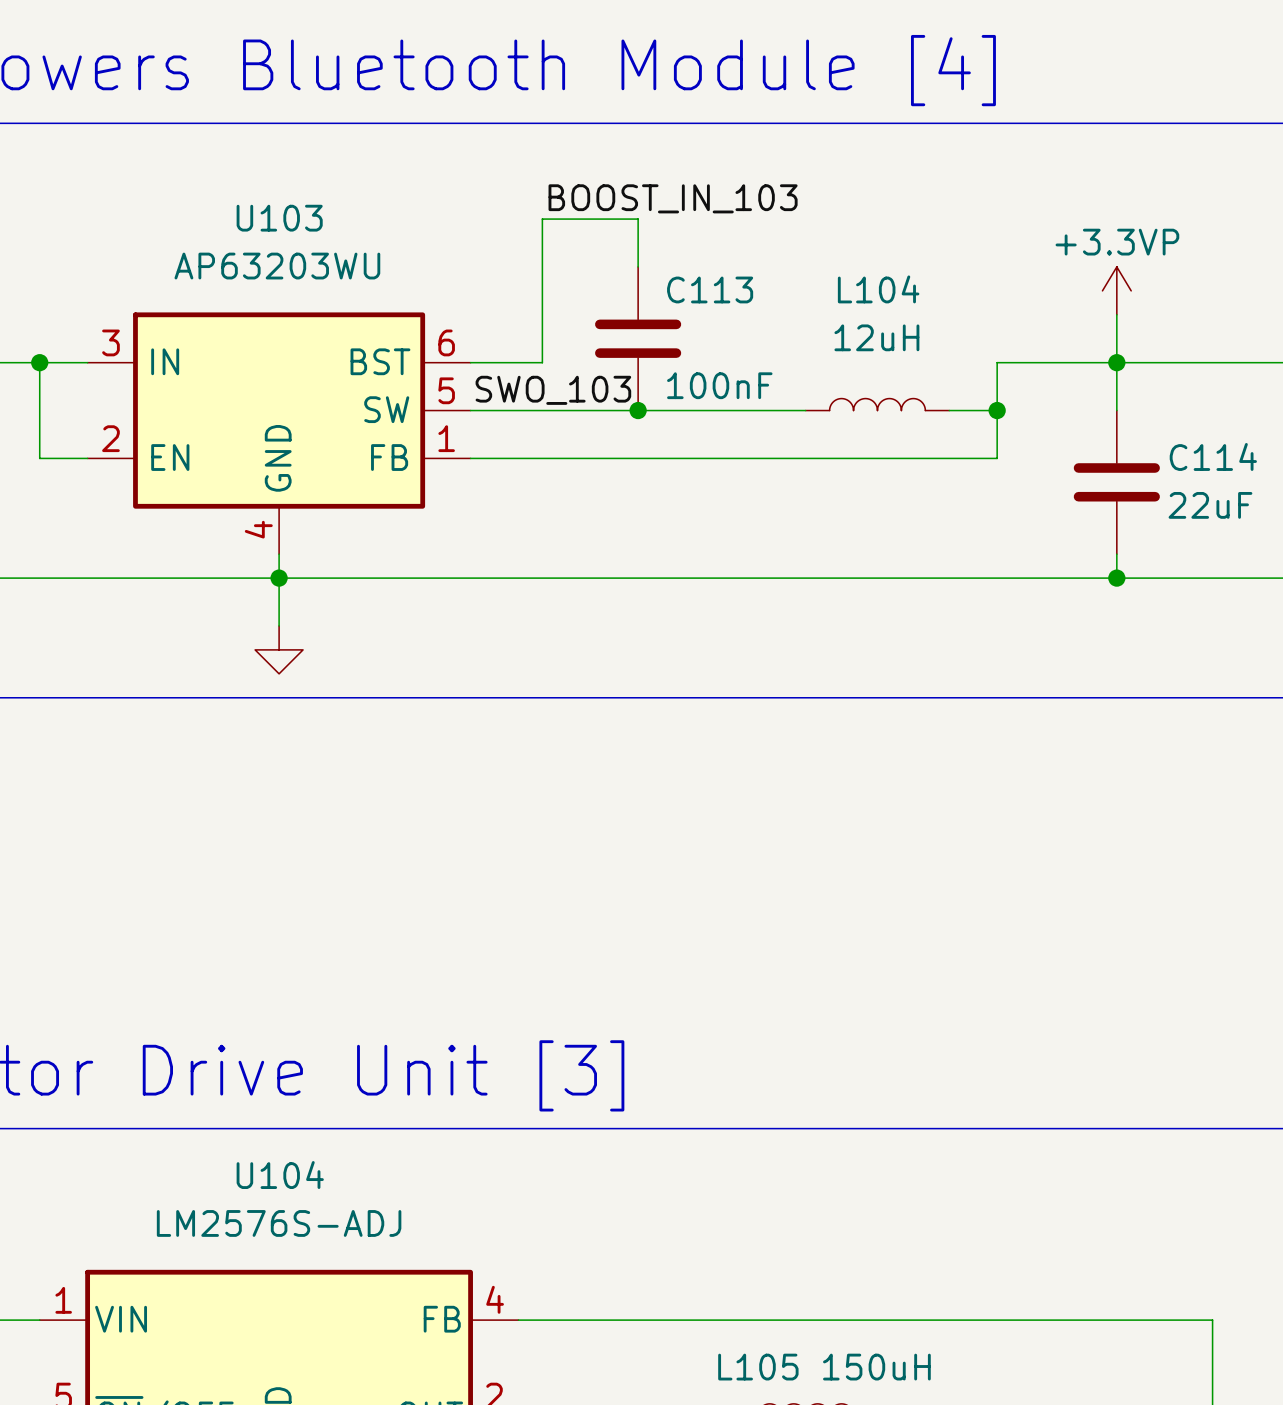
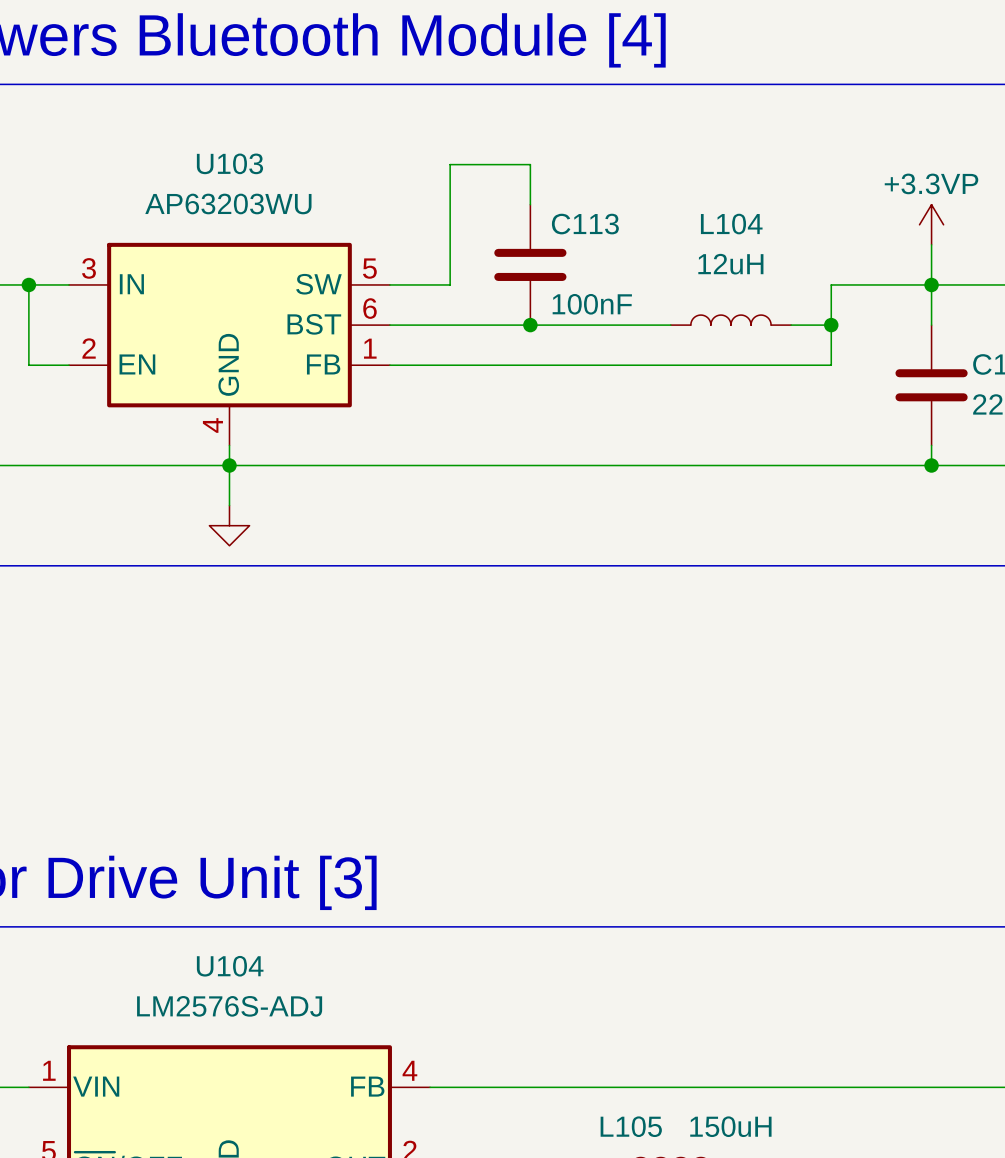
label: BOOST_IN_103 (673, 198) -> none
U103 pin number: 6 (446, 342) -> 5 (369, 268)
U103 pin name: BST (380, 361) -> SW (318, 284)
U103 pin number: 5 (446, 390) -> 6 (370, 308)
label: SWO_103 (553, 390) -> none
U103 pin name: SW (386, 409) -> BST (314, 324)

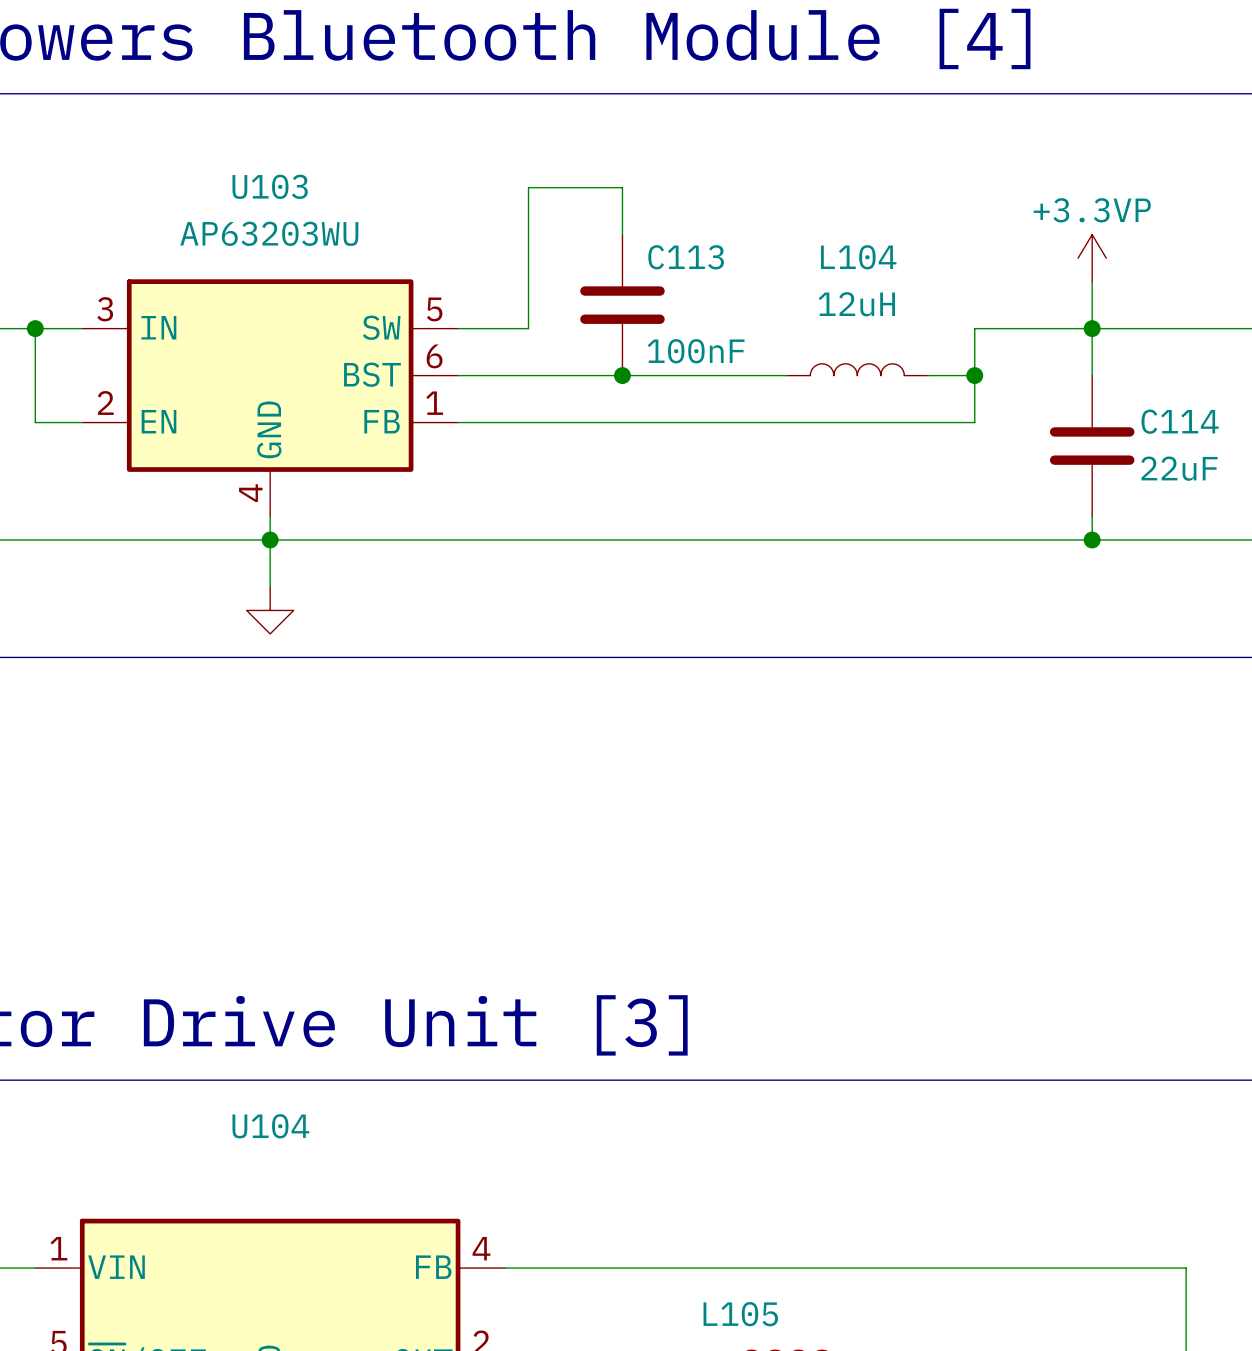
U104 value: LM2576S-ADJ (229, 1006) -> none
L105 value: 150uH (730, 1126) -> none

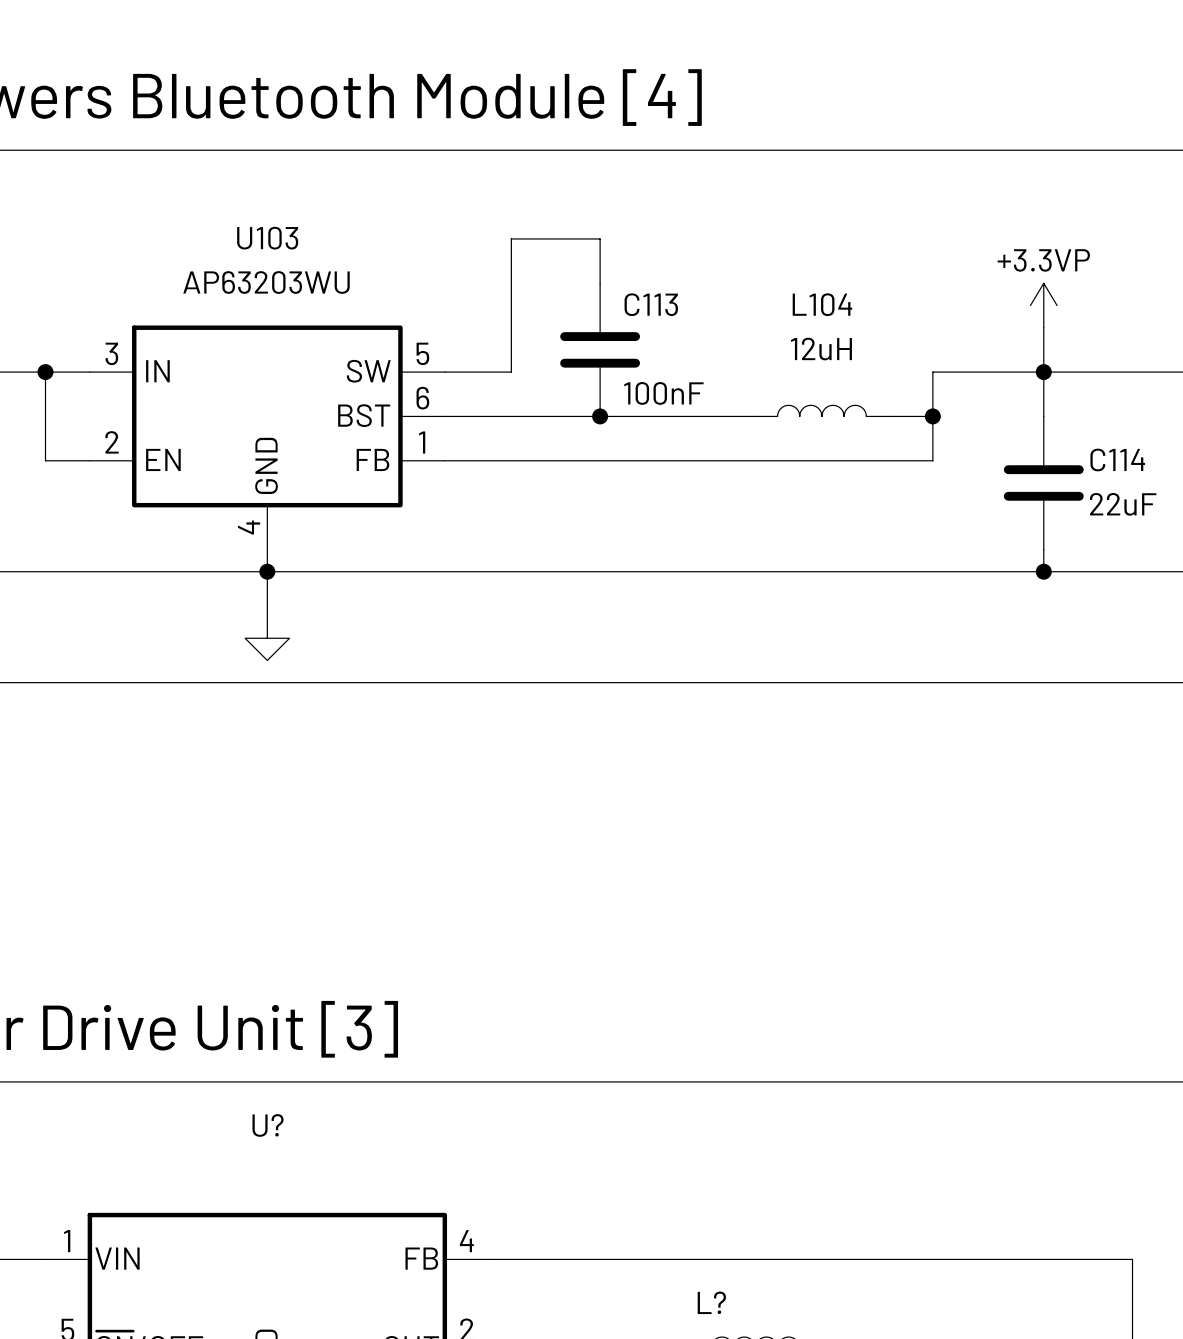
U104 name: U104 (270, 1126) -> U? (268, 1125)
L105 name: L105 (740, 1314) -> L? (711, 1302)

